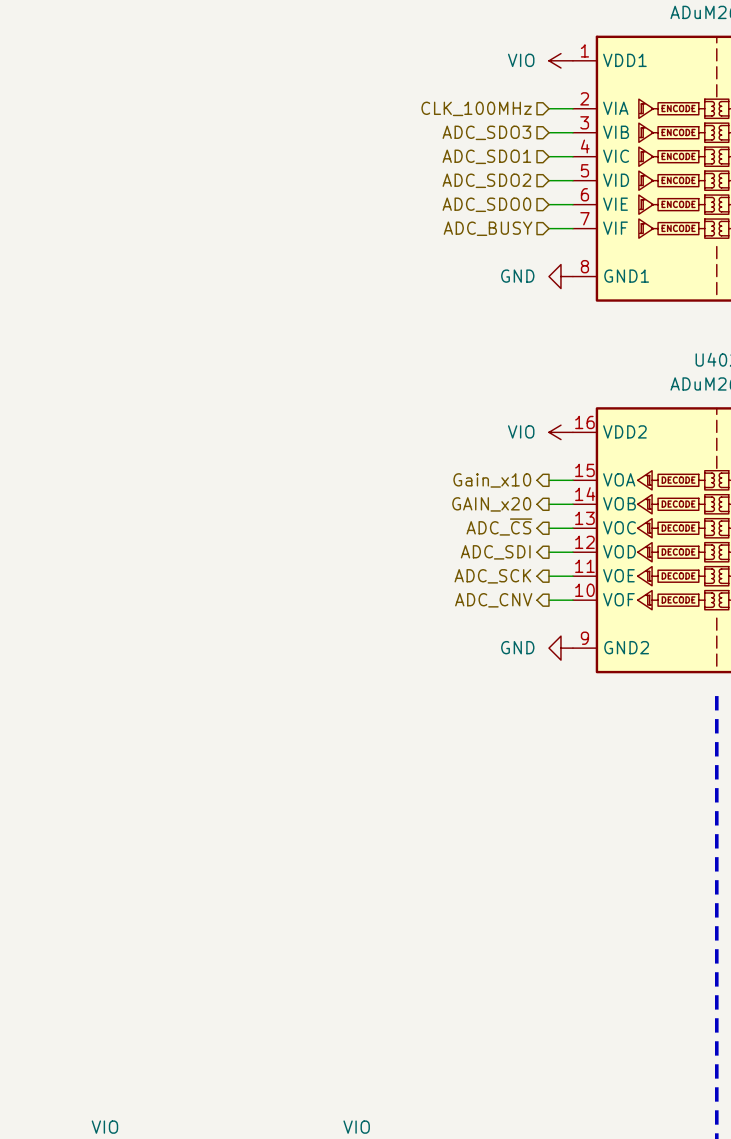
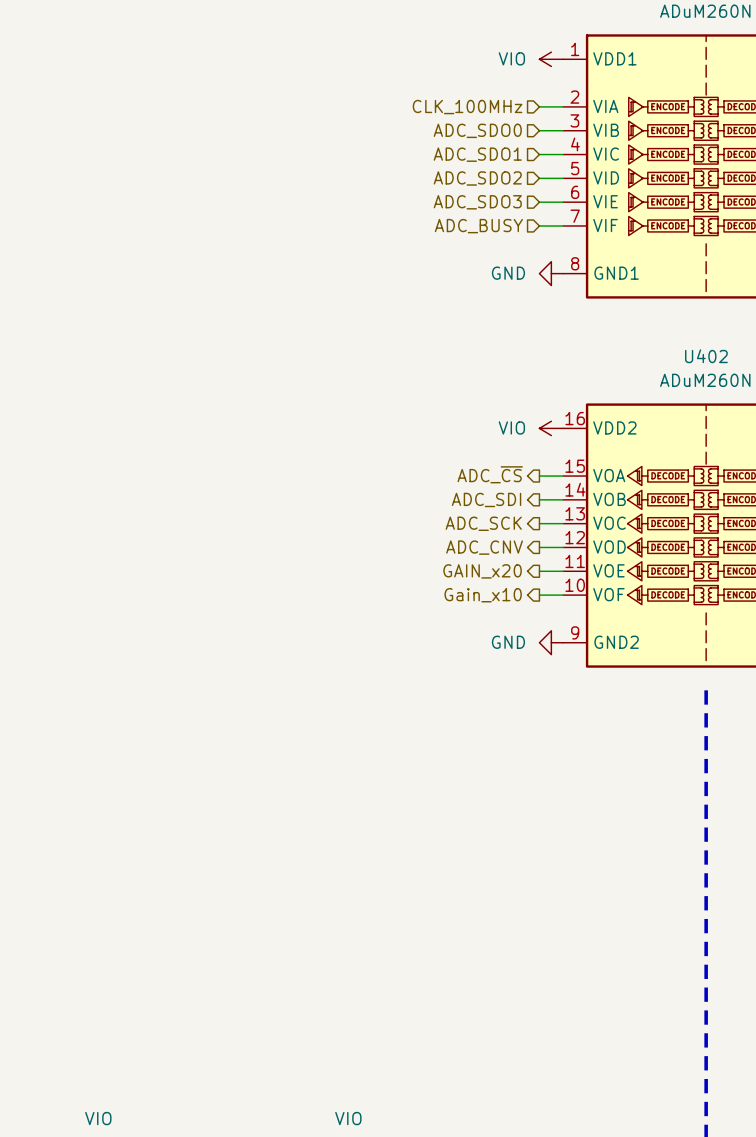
hierarchical label: ADC_SDO3 (486, 132) -> ADC_SDO0 (477, 130)
hierarchical label: ADC_SDO0 (486, 204) -> ADC_SDO3 (477, 202)
hierarchical label: Gain_x10 (492, 480) -> ADC_~{CS} (490, 474)
hierarchical label: GAIN_x20 (491, 504) -> ADC_SDI (486, 499)
hierarchical label: ADC_~{CS} (499, 527) -> ADC_SCK (483, 523)
hierarchical label: ADC_SDI (495, 552) -> ADC_CNV (484, 547)
hierarchical label: ADC_SCK (492, 576) -> GAIN_x20 (482, 571)
hierarchical label: ADC_CNV (493, 600) -> Gain_x10 (483, 595)

